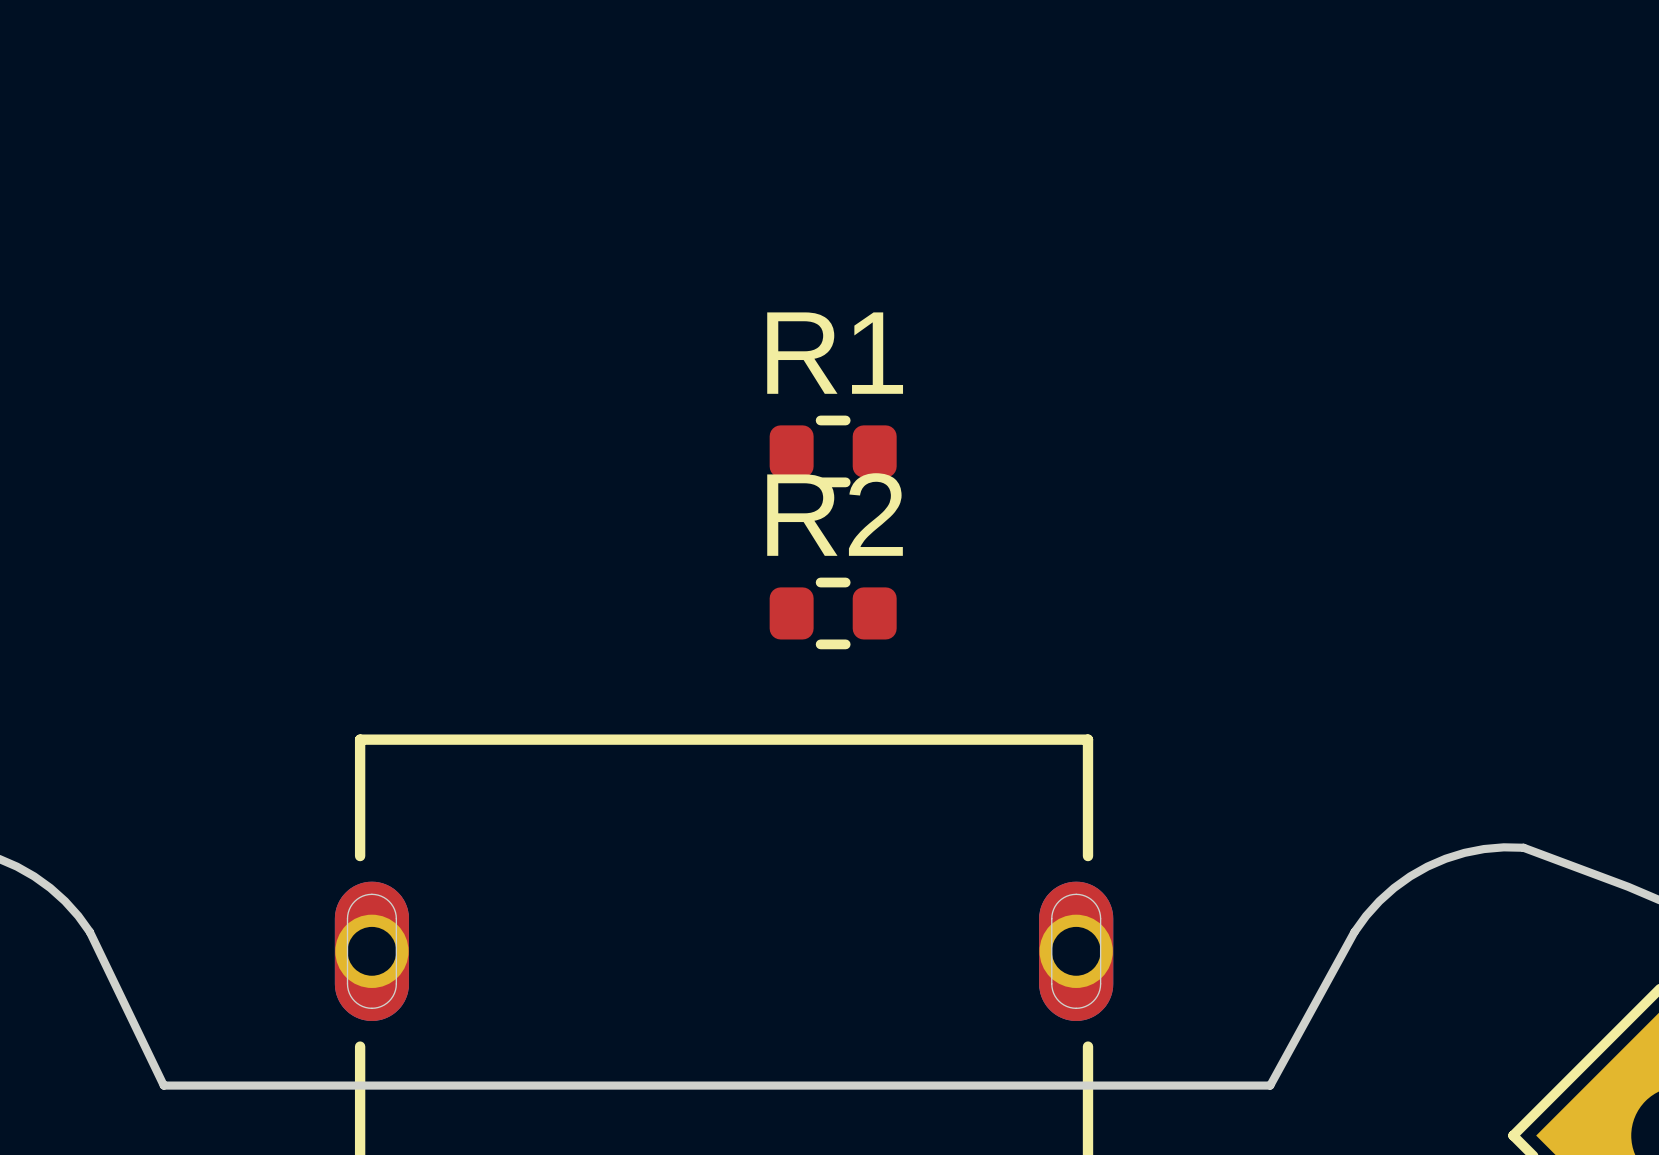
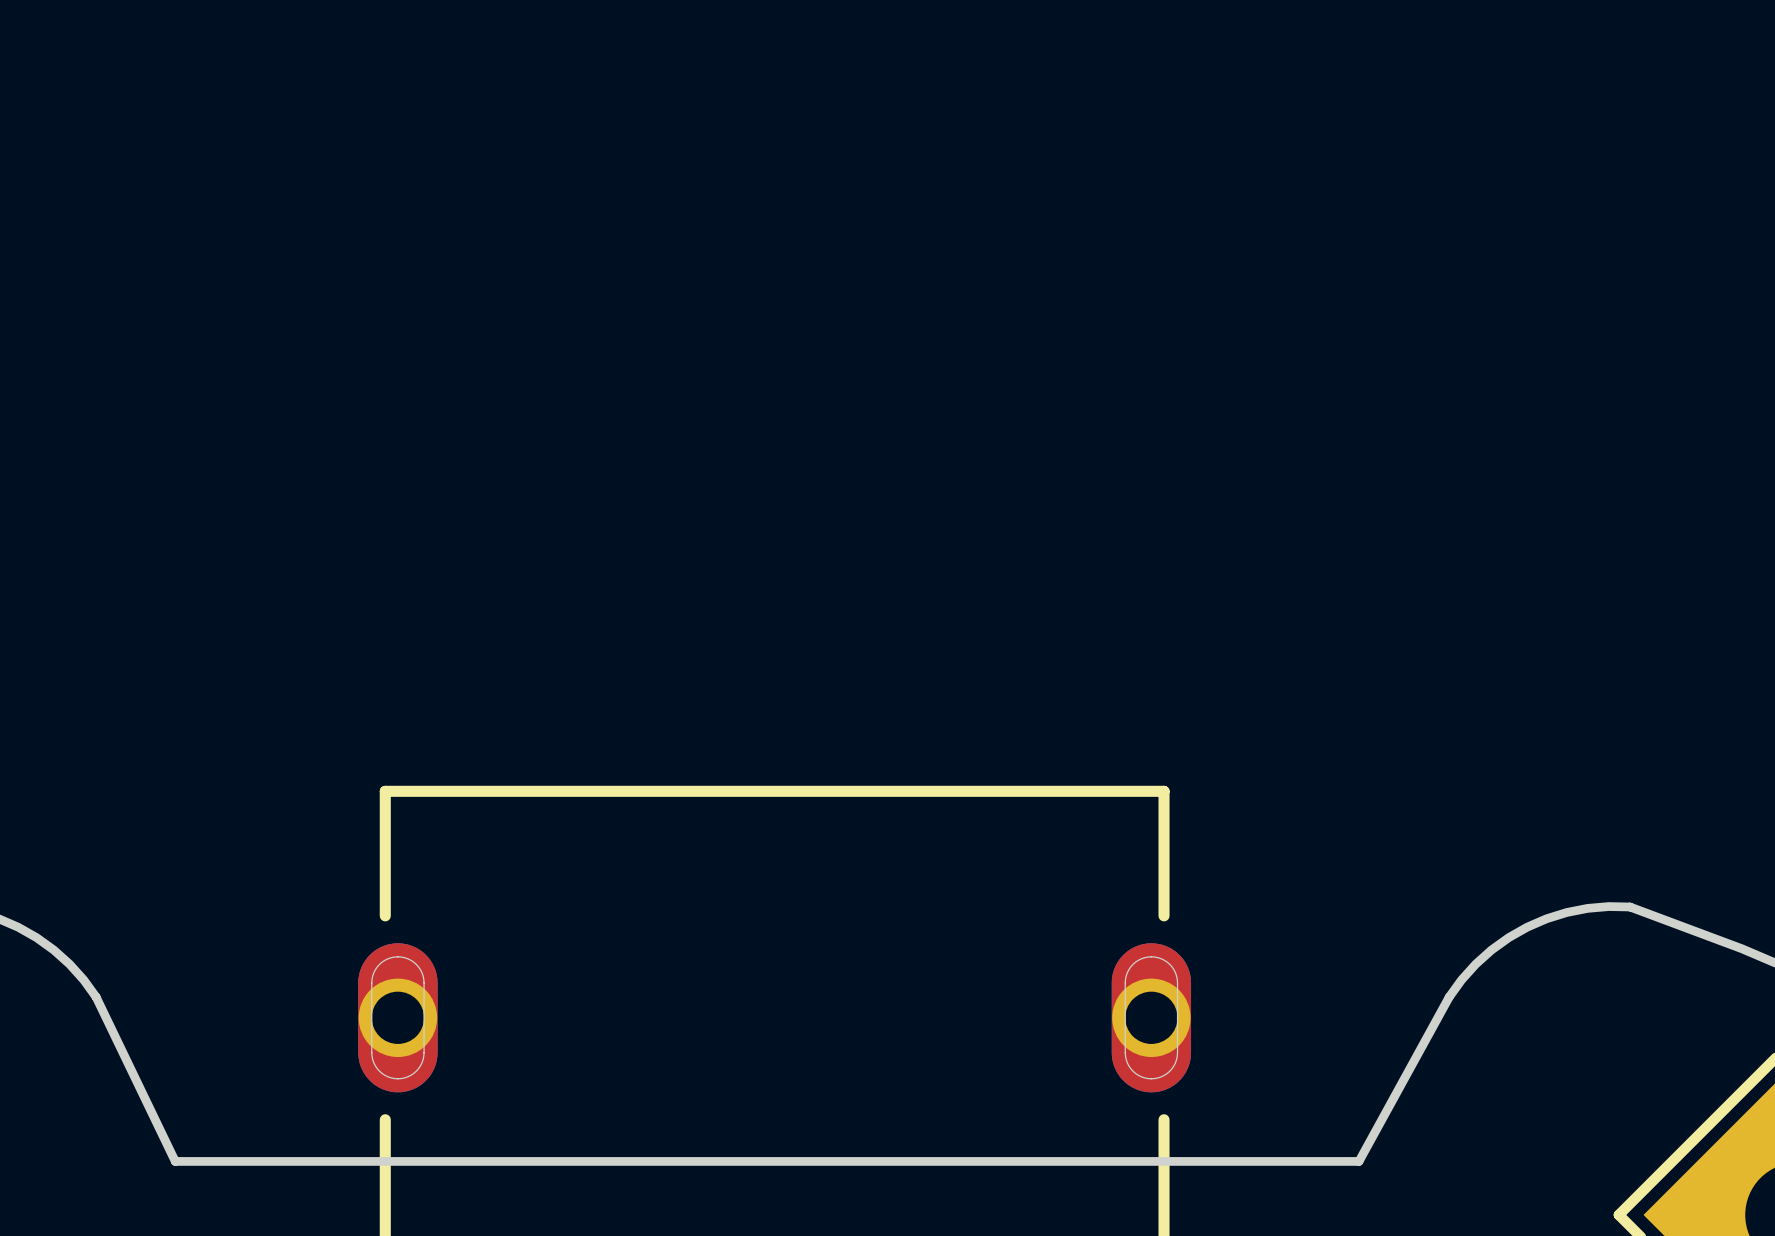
R1: (833, 451) -> none
R2: (833, 613) -> none

